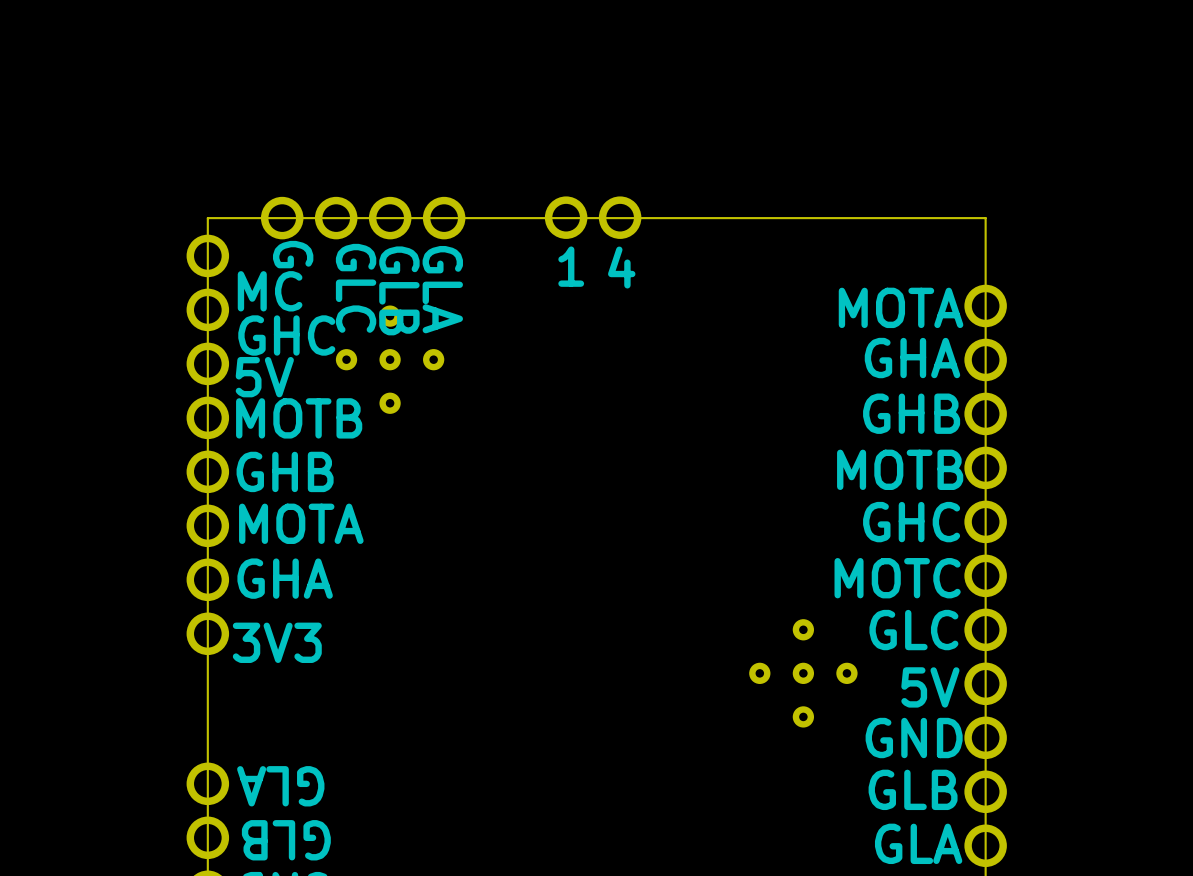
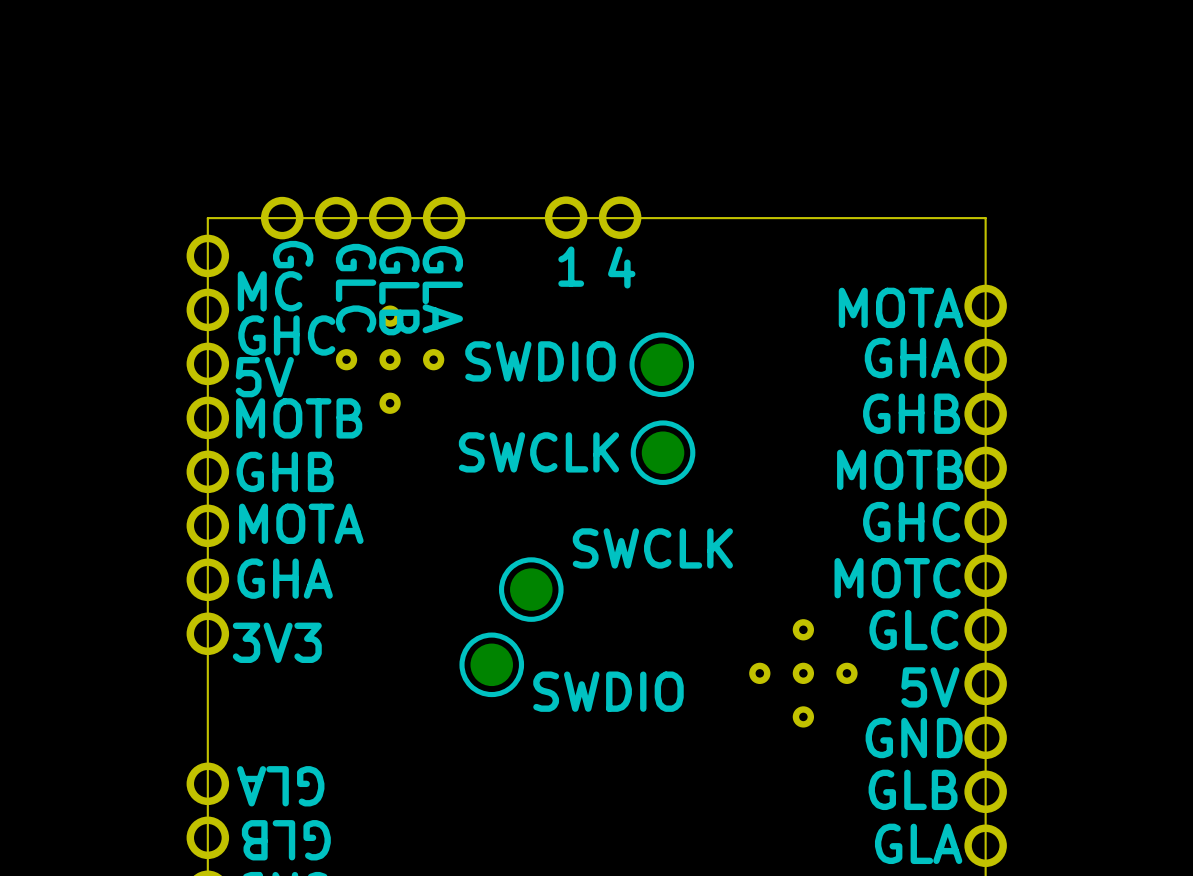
text: none -> SWDIO (540, 361)
part: none -> (661, 364)
text: none -> SWCLK (538, 452)
part: none -> (663, 452)
text: none -> SWCLK (652, 548)
part: none -> (531, 589)
part: none -> (491, 664)
text: none -> SWDIO (608, 691)

